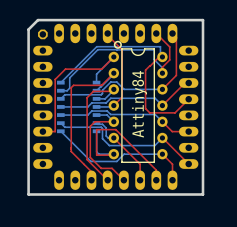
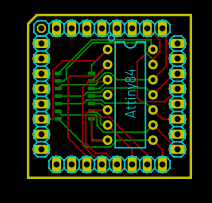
part side: bottom (115, 33) -> top (109, 28)
part side: bottom (42, 34) -> top (41, 28)
part side: bottom (42, 107) -> top (41, 96)
part side: bottom (188, 107) -> top (177, 96)
part side: bottom (115, 180) -> top (109, 164)

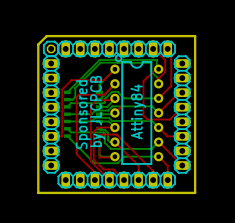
text: none -> by JLCPCB (97, 111)
text: none -> Sponsored (83, 114)

